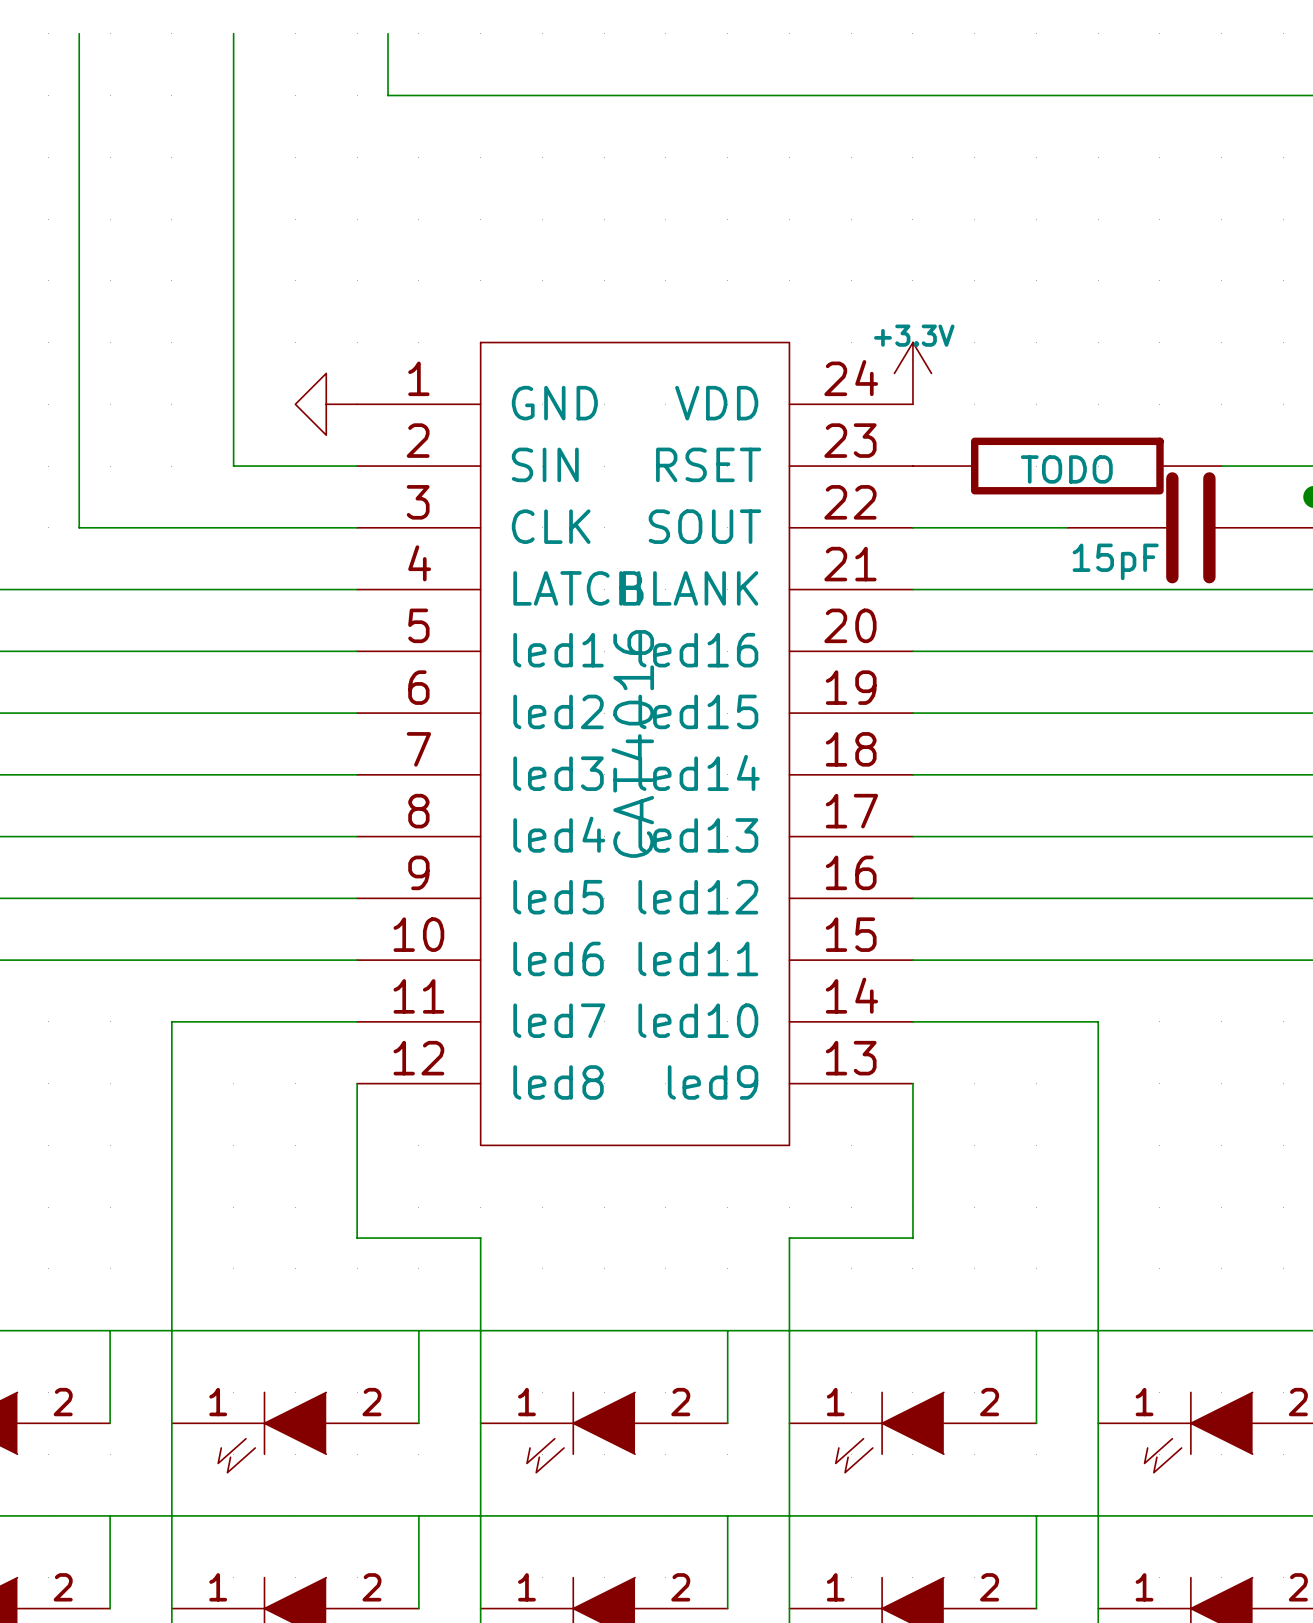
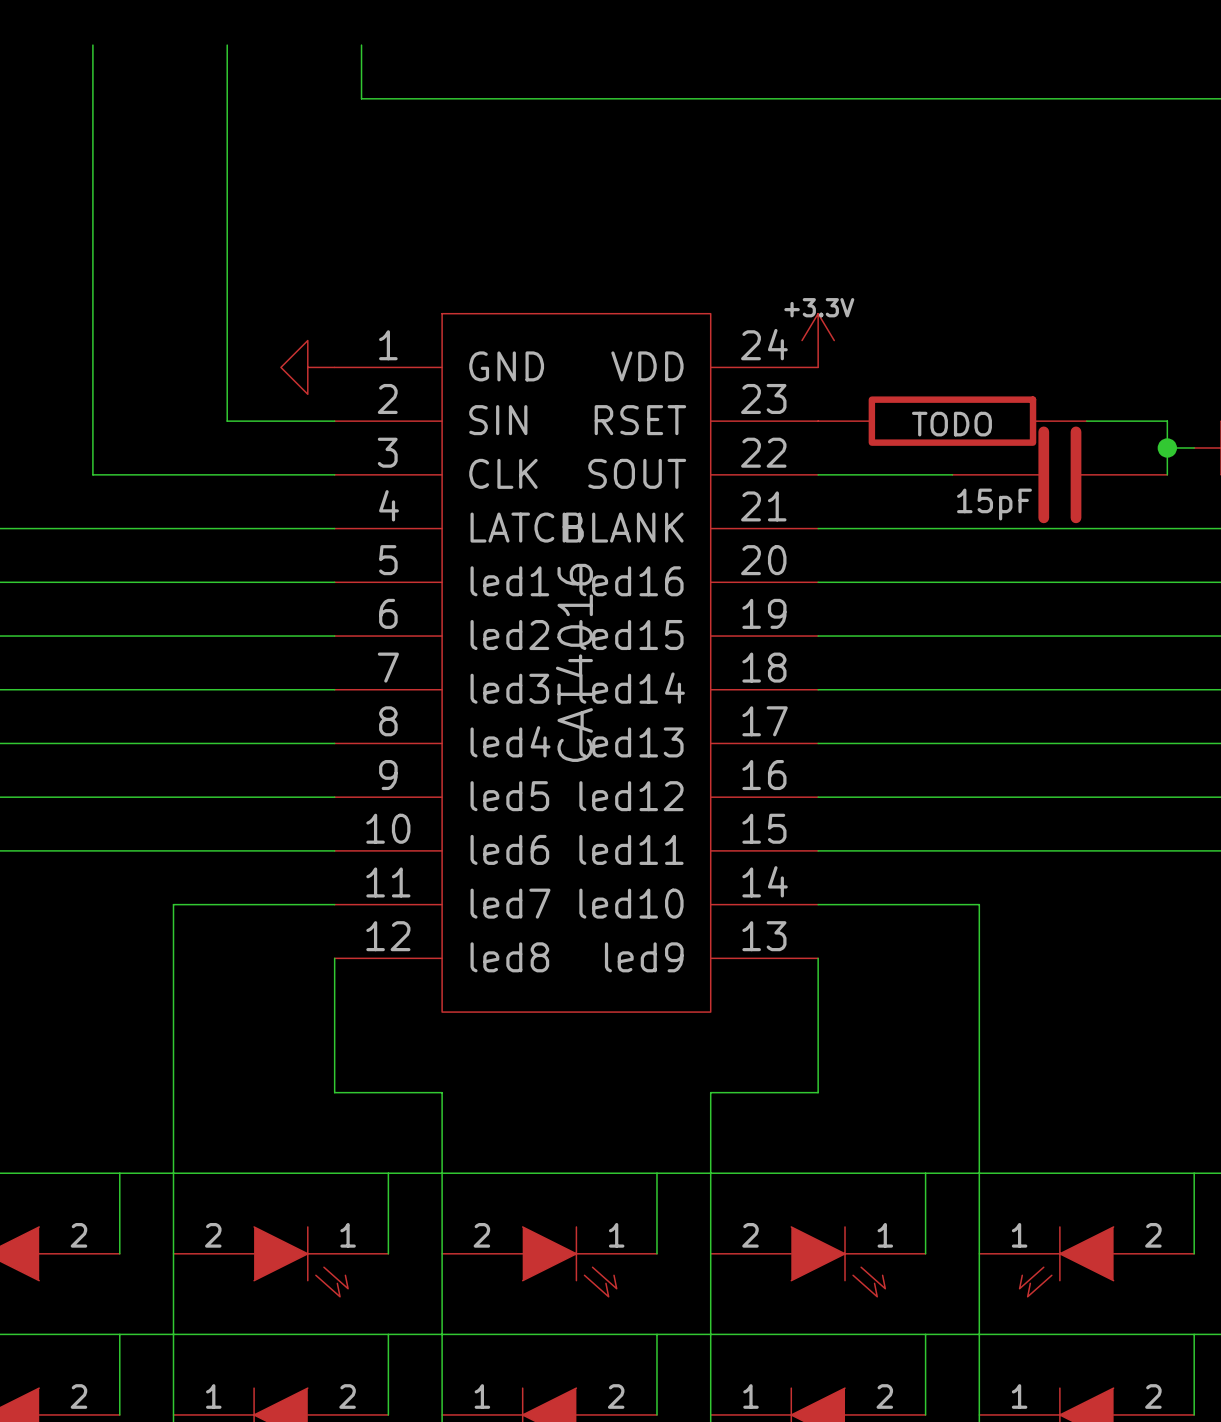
part flip: as is (272, 1432) -> left-right (301, 1261)
part flip: as is (581, 1432) -> left-right (569, 1261)
part flip: as is (889, 1432) -> left-right (838, 1261)

